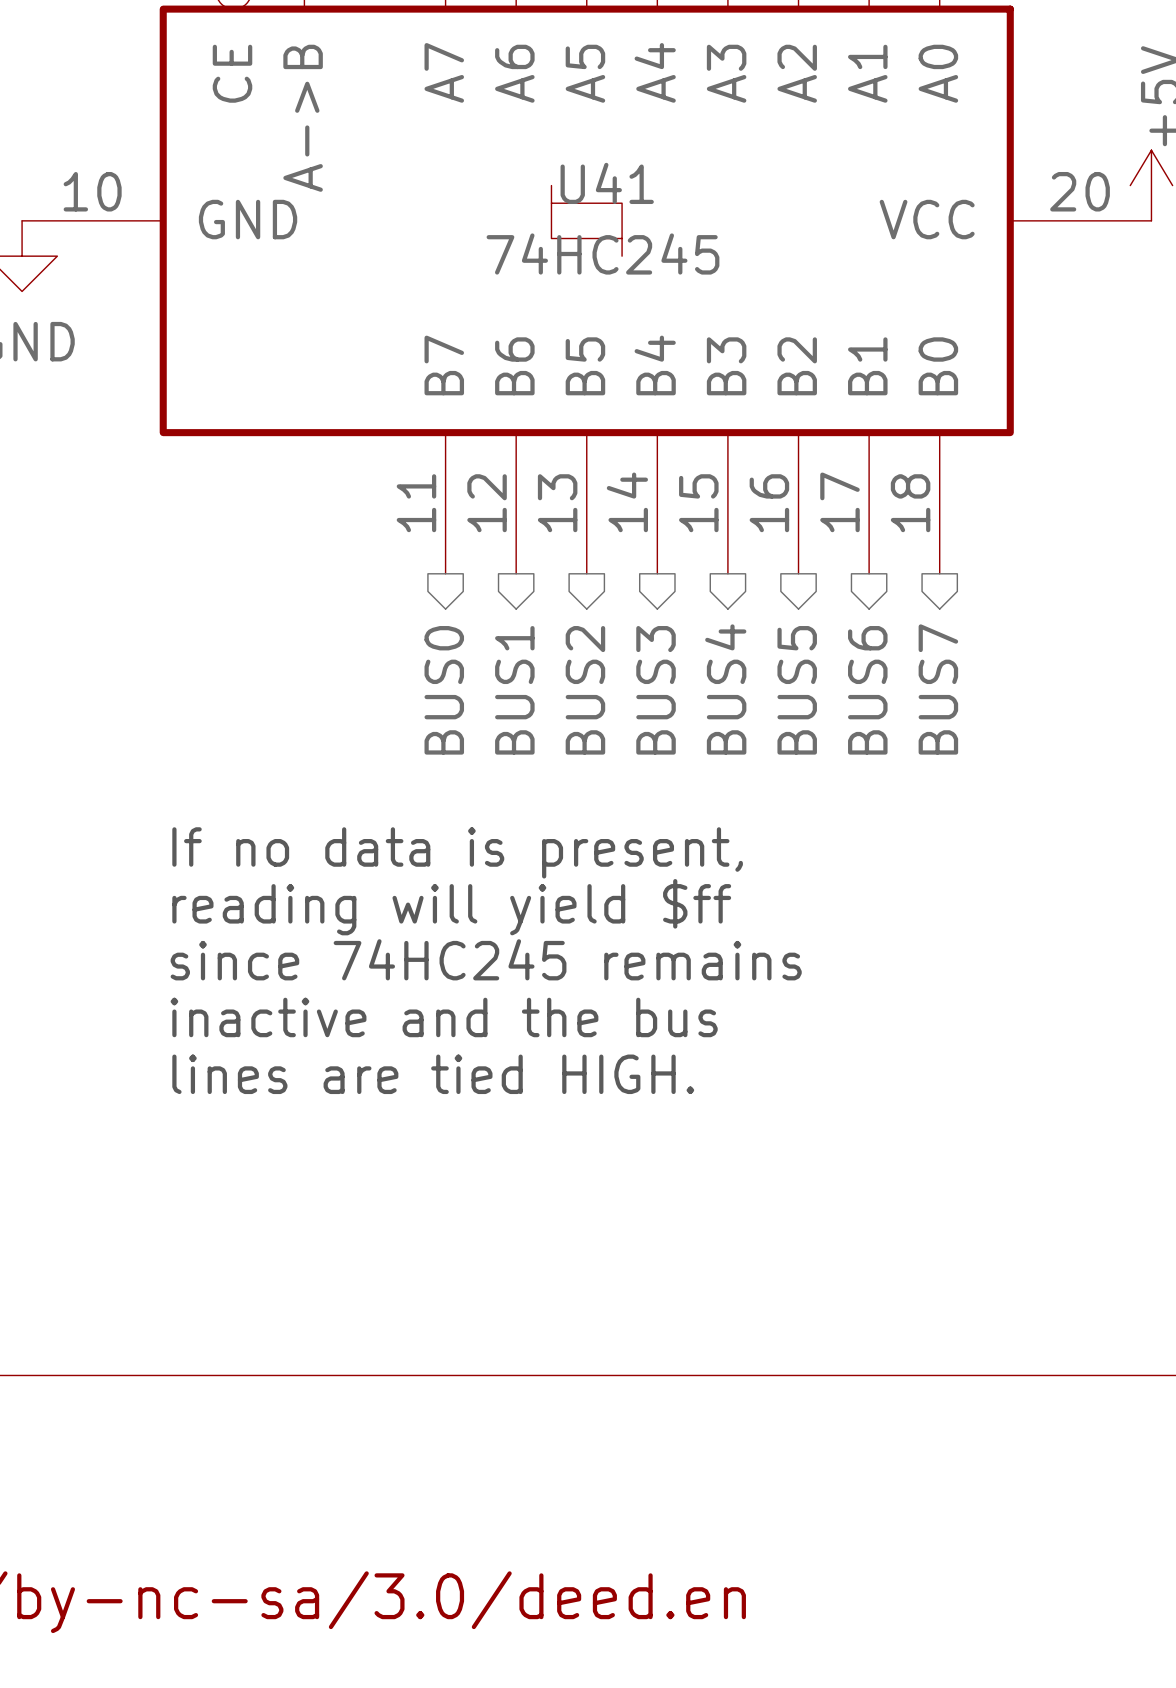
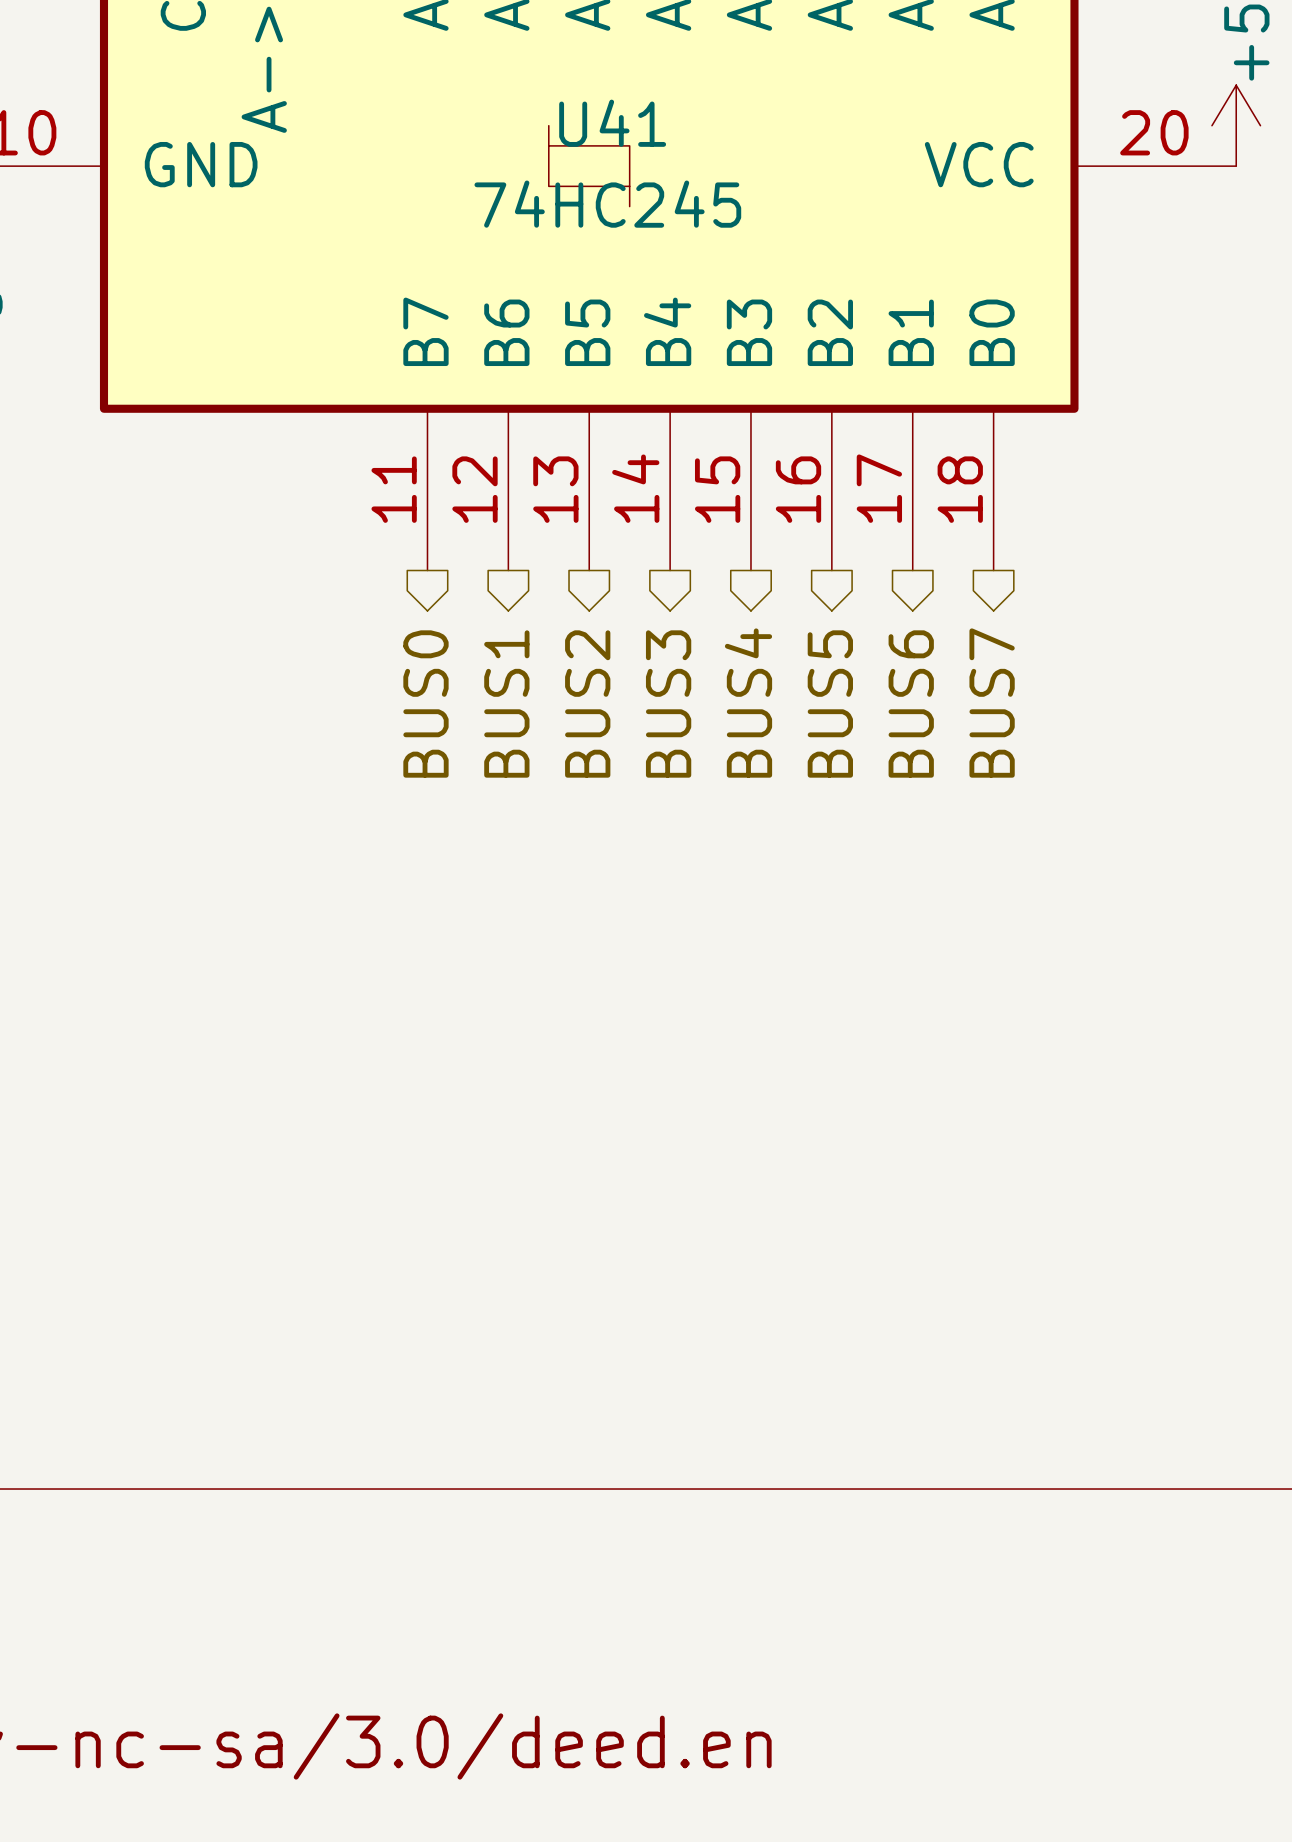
text: If no data is present, (457, 852) -> none
text: reading will yield $ff (451, 907) -> none
text: since 74HC245 remains (486, 959) -> none
text: inactive and the bus (444, 1017) -> none
text: lines are tied HIGH. (433, 1074) -> none

